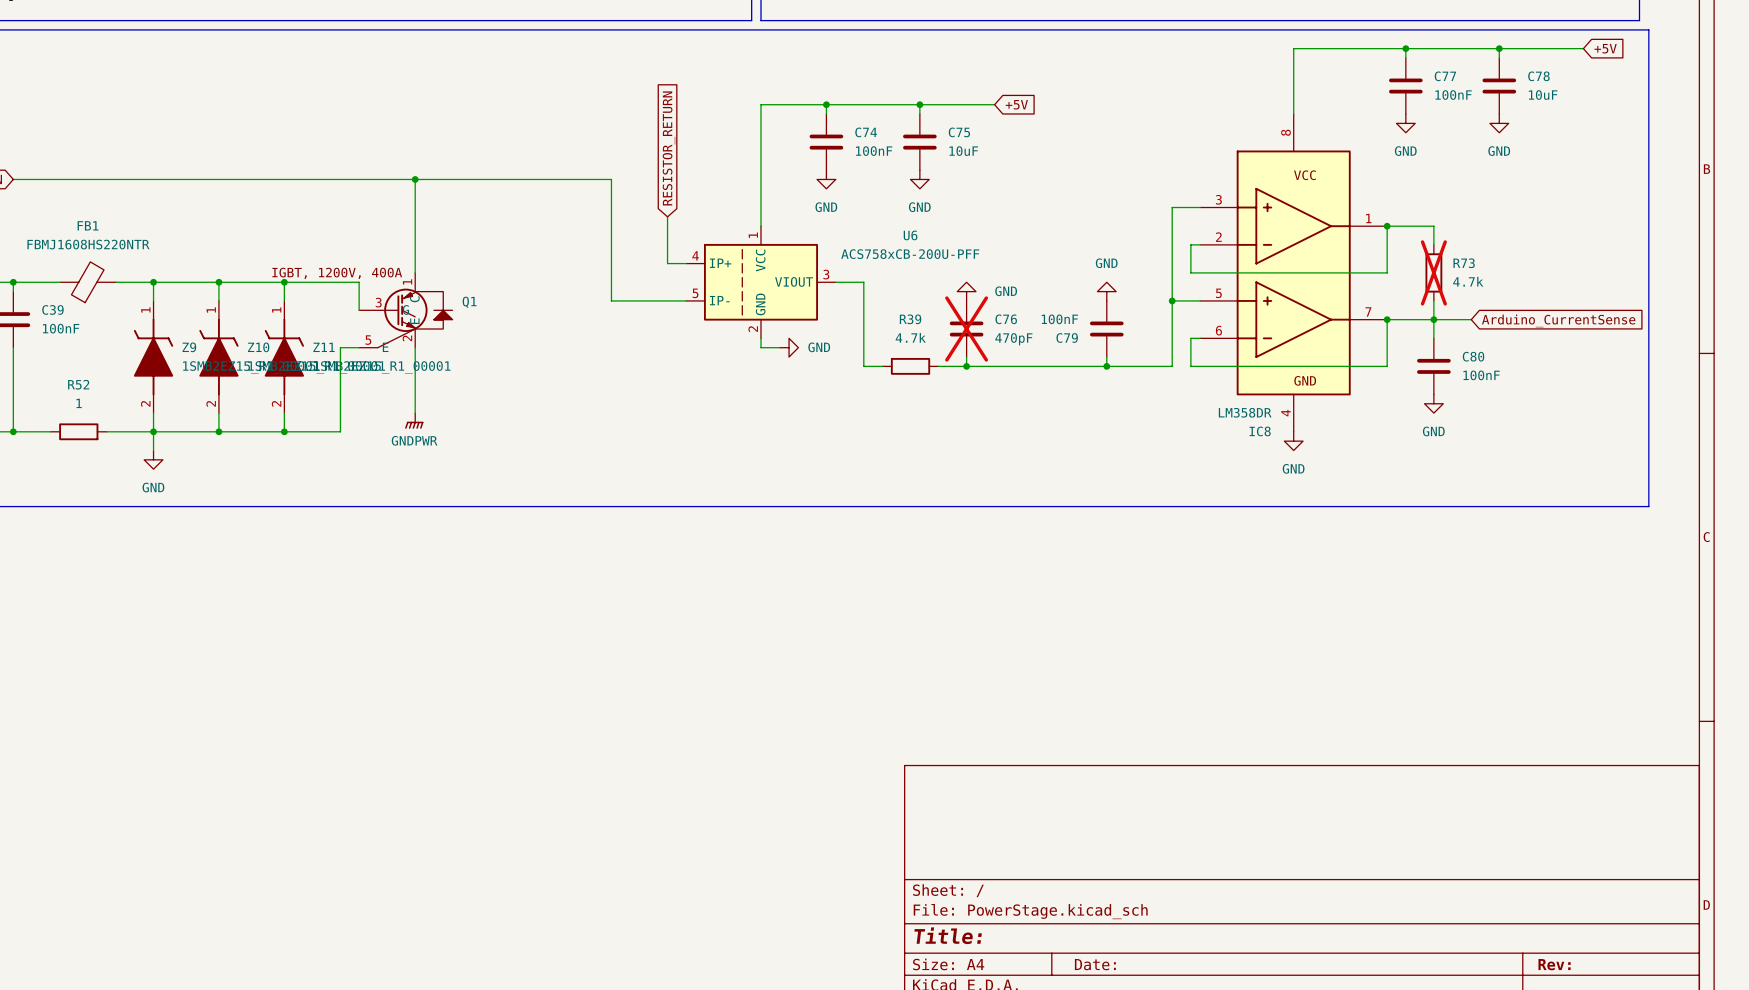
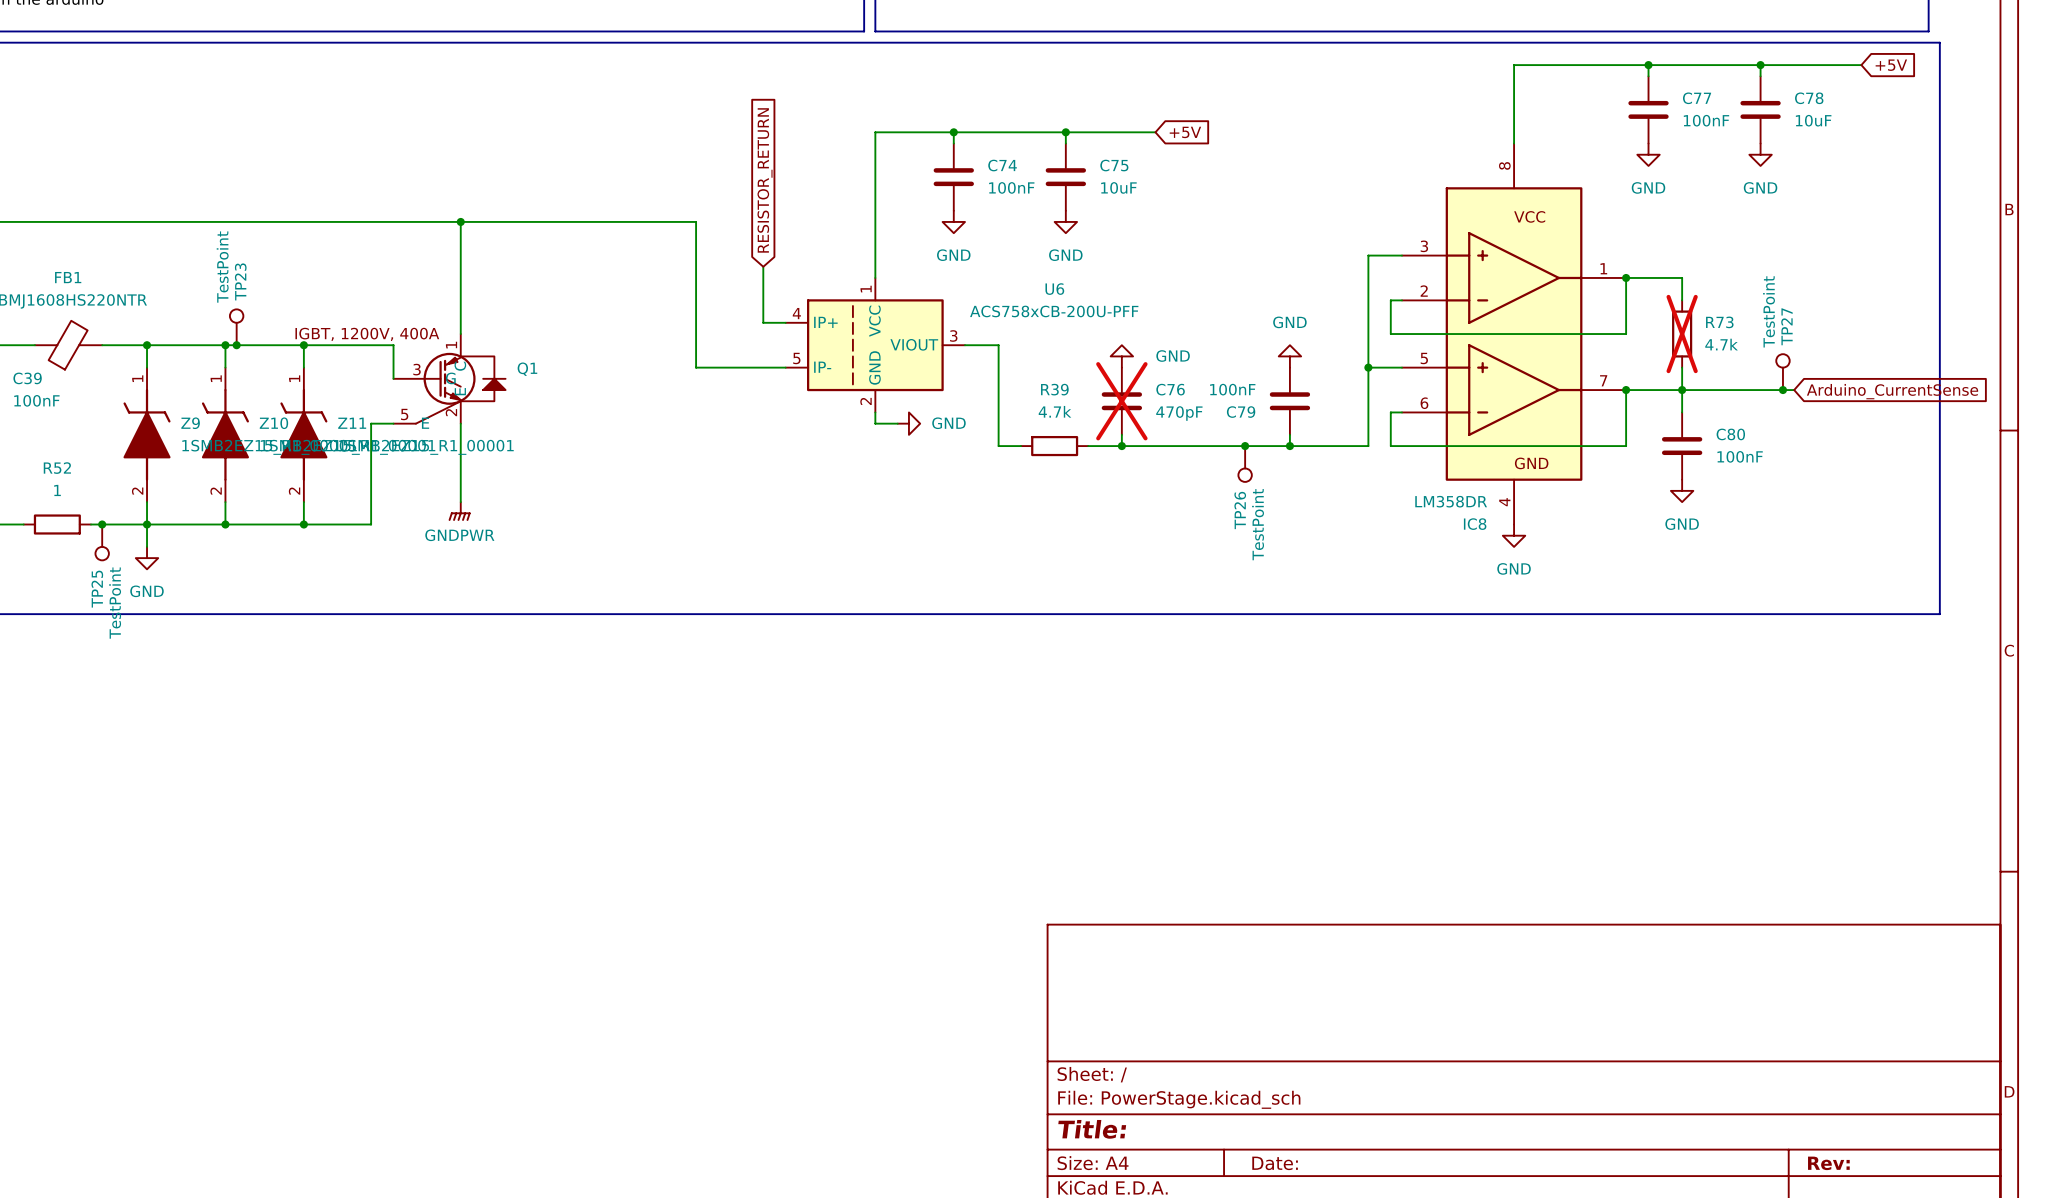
TP23: none -> TestPoint (236, 327)
junction: none -> (236, 345)
TP27: none -> TestPoint (1782, 372)
wire: none -> (1726, 390) (1794, 390)
junction: none -> (1782, 390)
global label position: Arduino_CurrentSense (1558, 320) -> Arduino_CurrentSense (1892, 391)
junction: none -> (1245, 446)
TP26: none -> TestPoint (1245, 463)
junction: none -> (102, 524)
TP25: none -> TestPoint (102, 542)

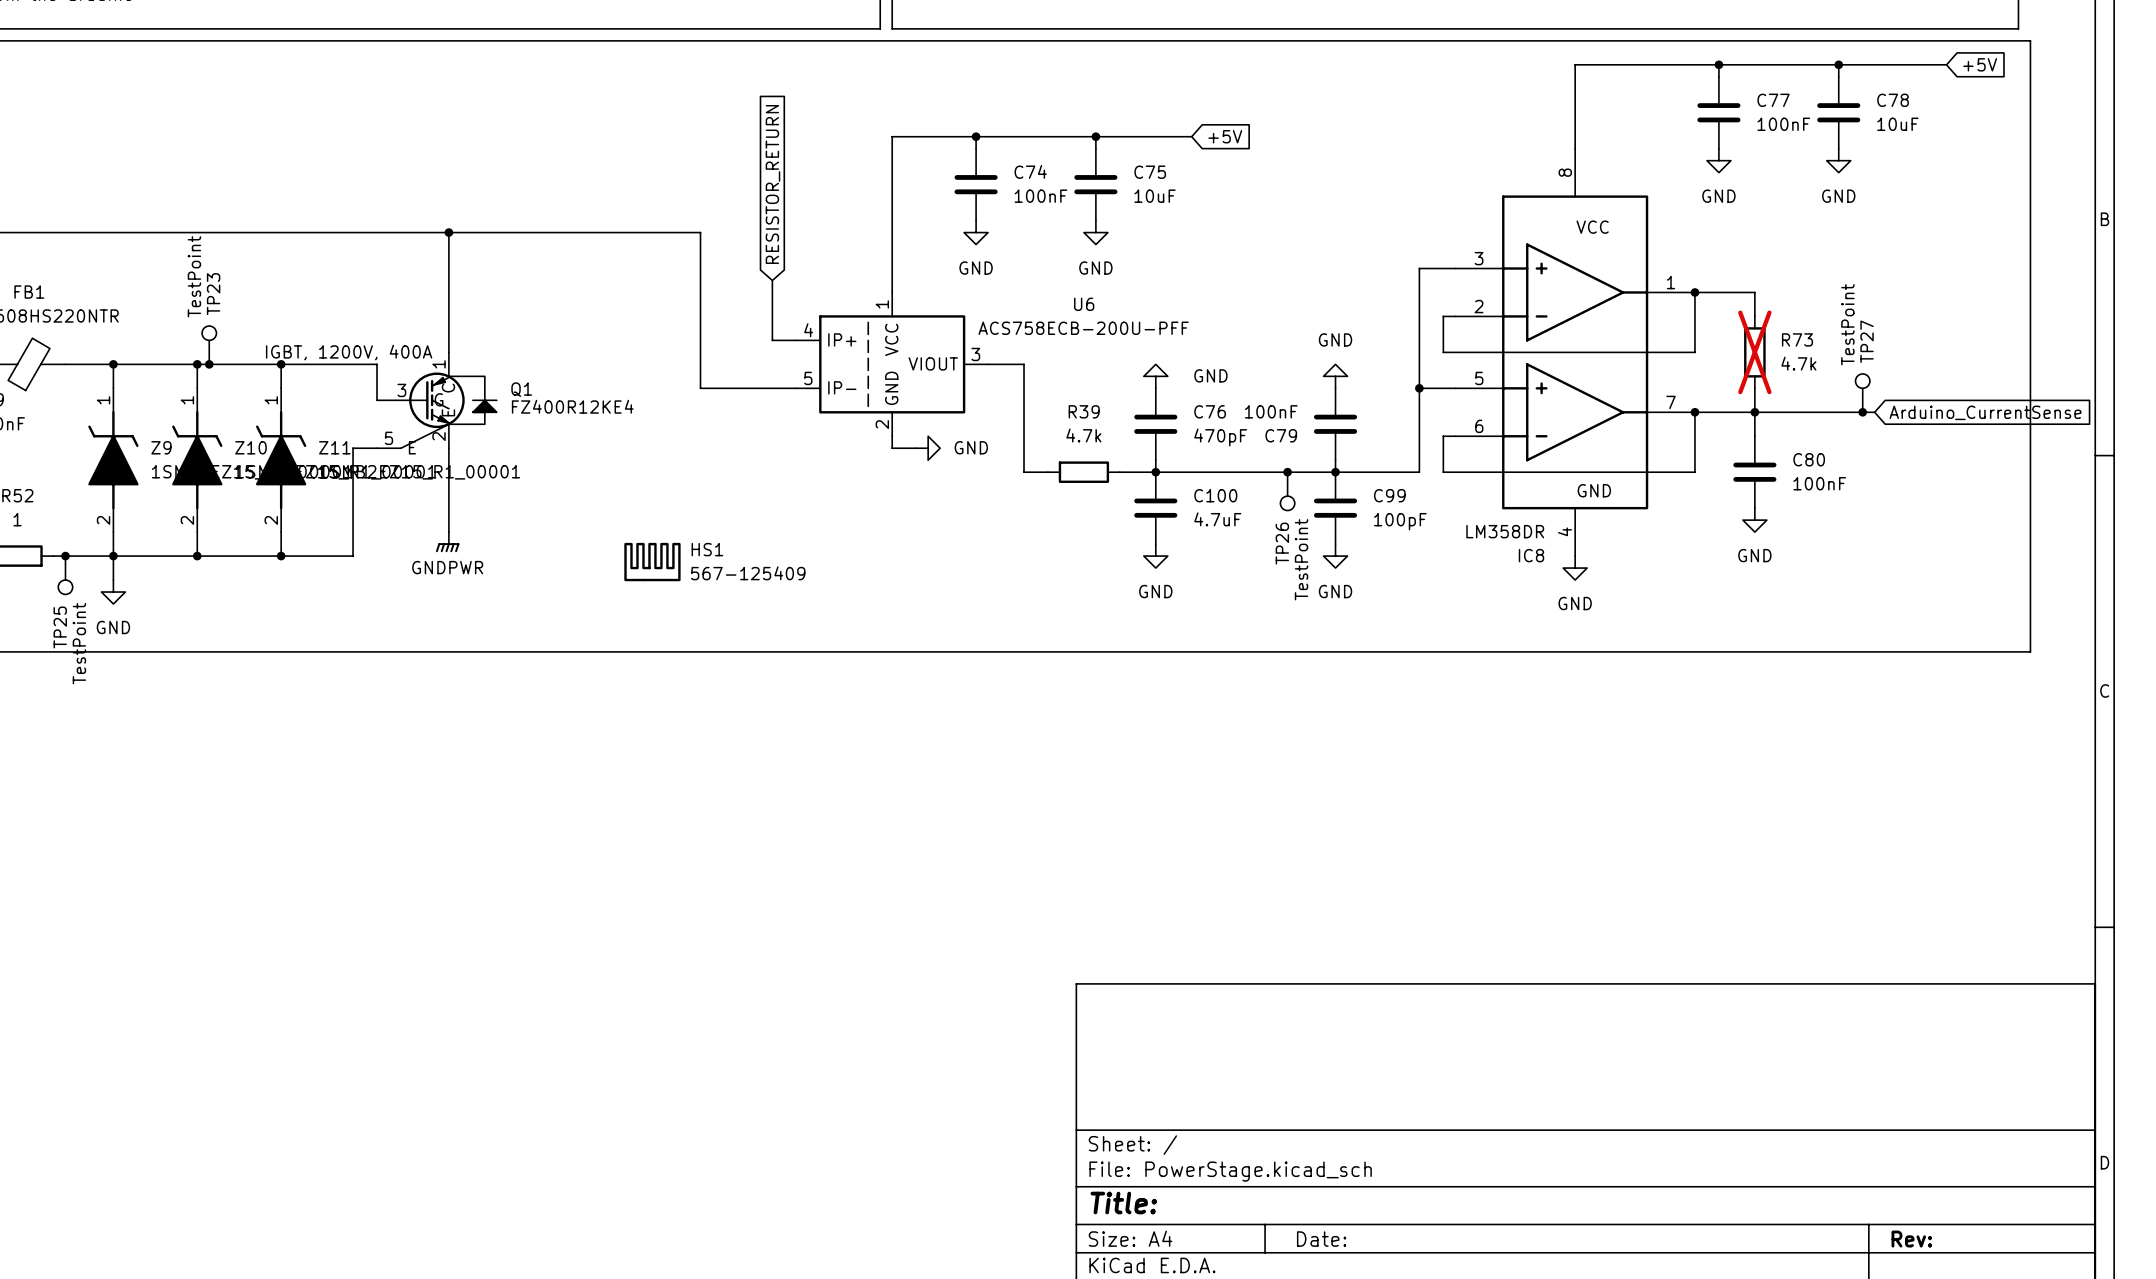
U6 value: ACS758xCB-200U-PFF (1054, 311) -> ACS758ECB-200U-PFF (1083, 328)
Q1 value: none -> FZ400R12KE4 (572, 406)
C76 do-not-place cross: (1121, 401) -> none
C100: none -> 4.7uF (1155, 508)
C99: none -> 100pF (1335, 508)
power symbol: none -> GND (1155, 556)
power symbol: none -> GND (1335, 556)
HS1: none -> 567-125409 (652, 562)

